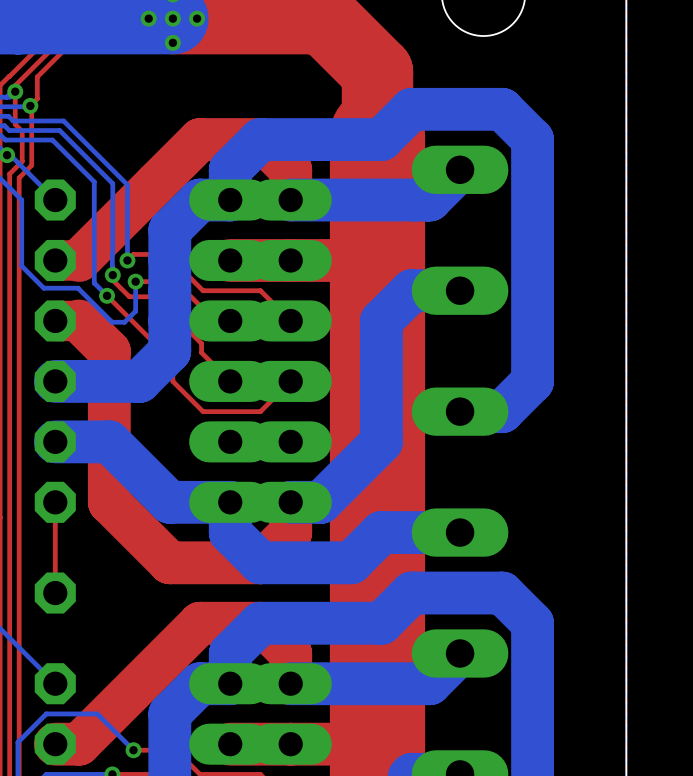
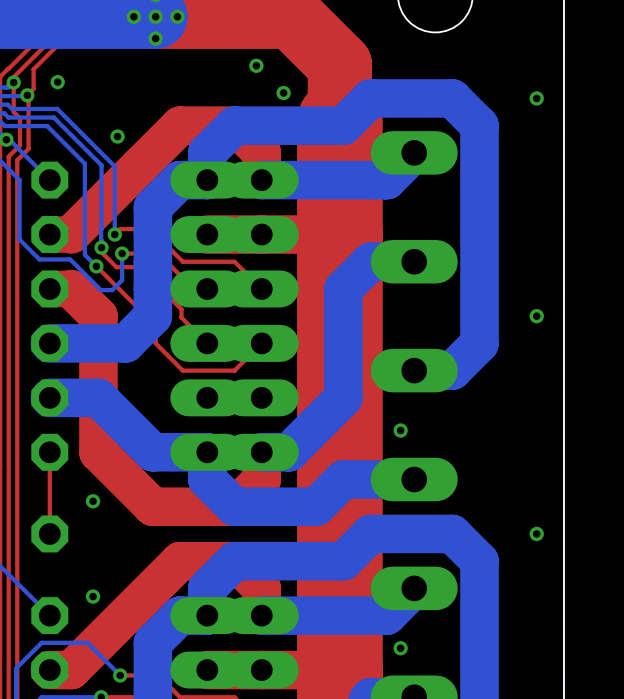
via: none -> (256, 65)
via: none -> (57, 82)
via: none -> (283, 93)
via: none -> (536, 98)
via: none -> (117, 136)
via: none -> (536, 316)
via: none -> (400, 430)
via: none -> (93, 501)
via: none -> (536, 533)
via: none -> (93, 596)
via: none -> (400, 648)

